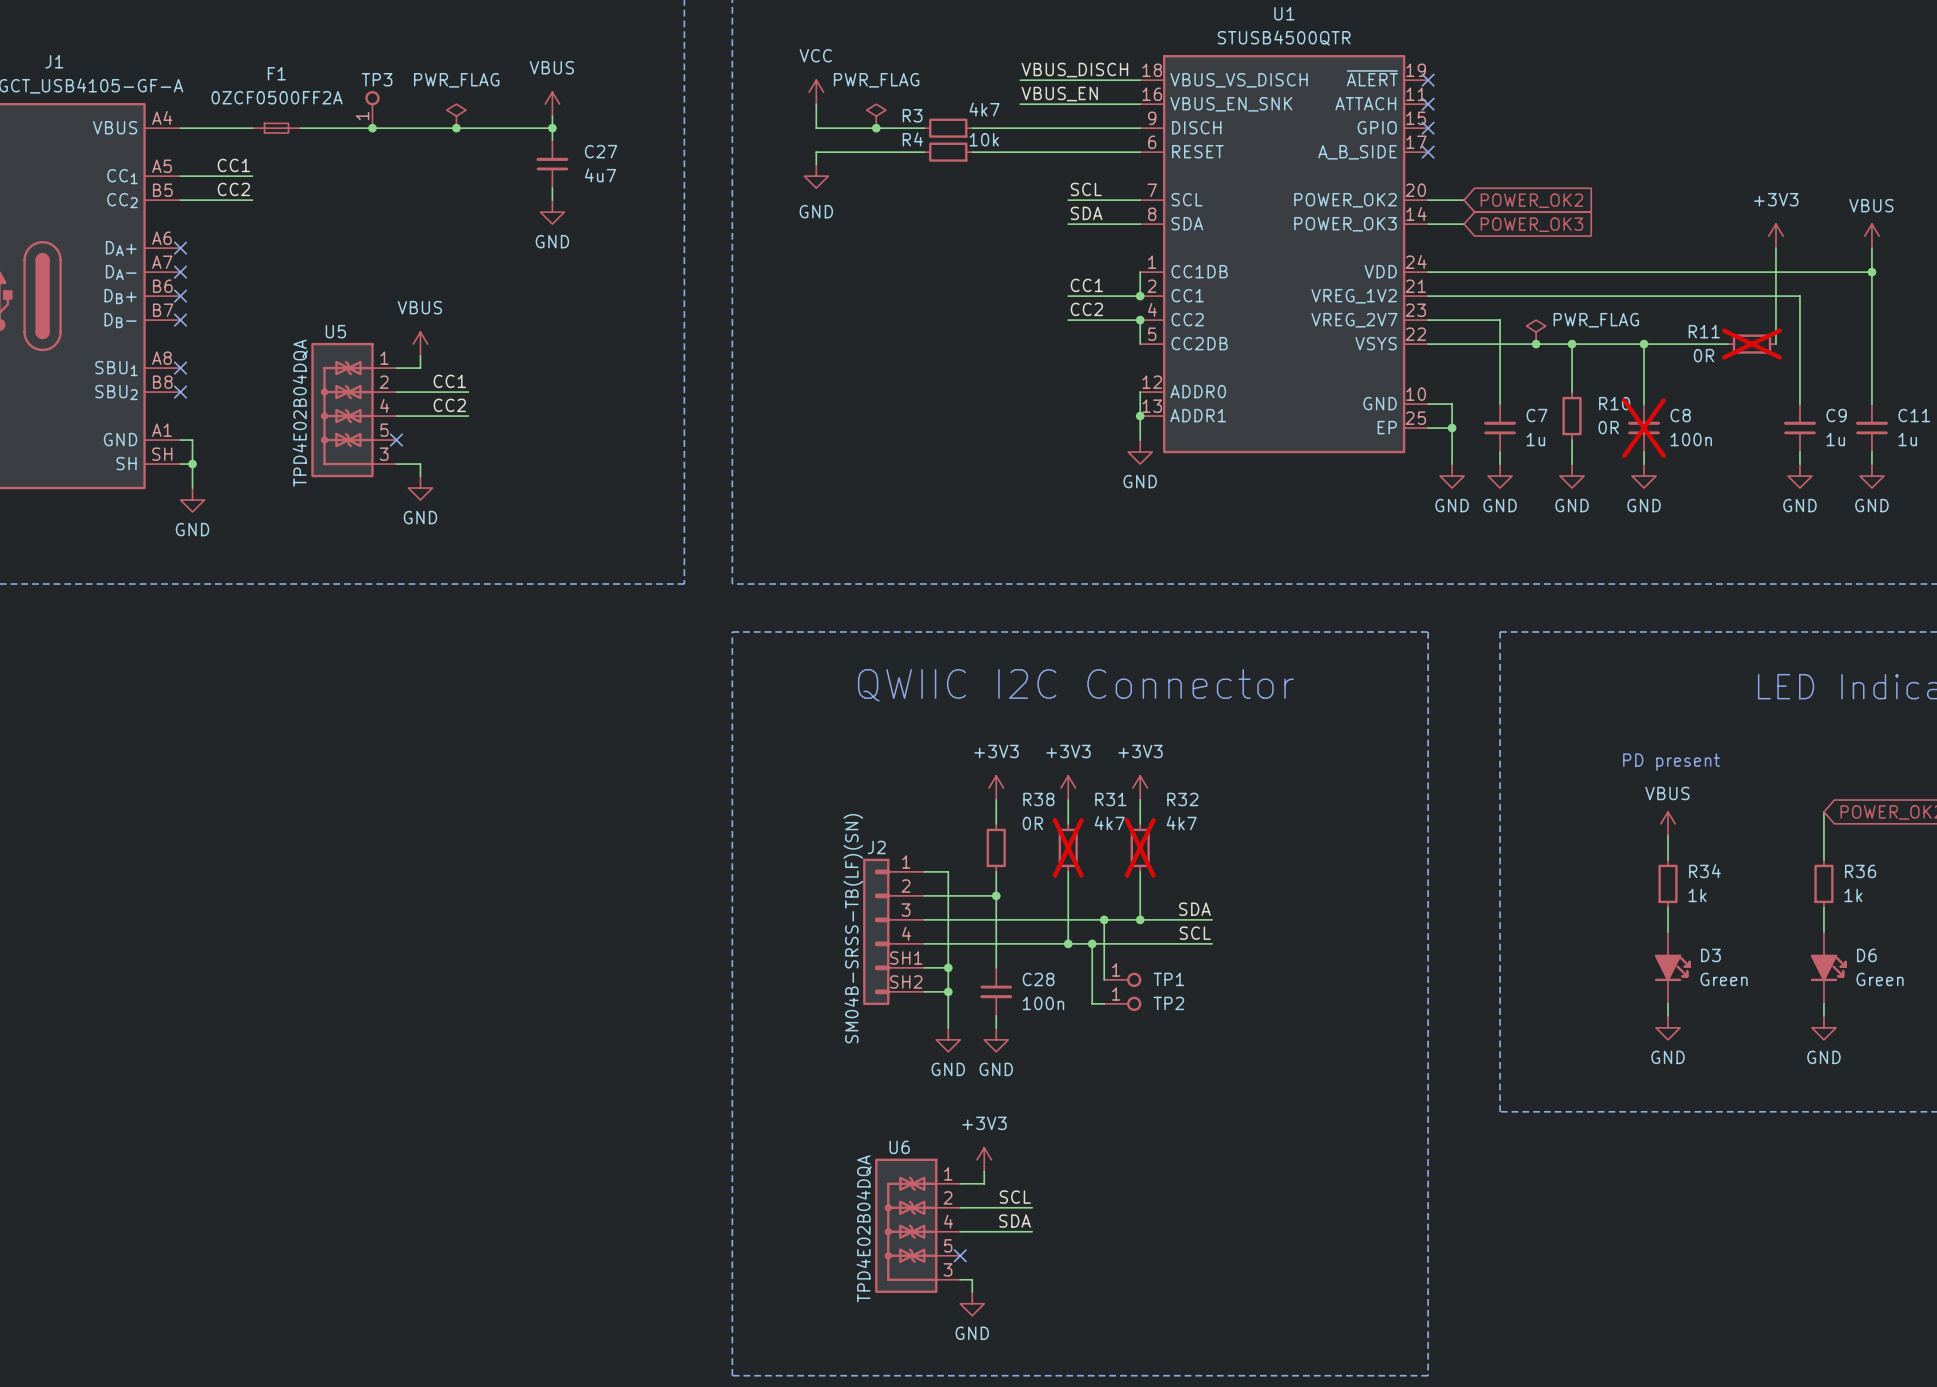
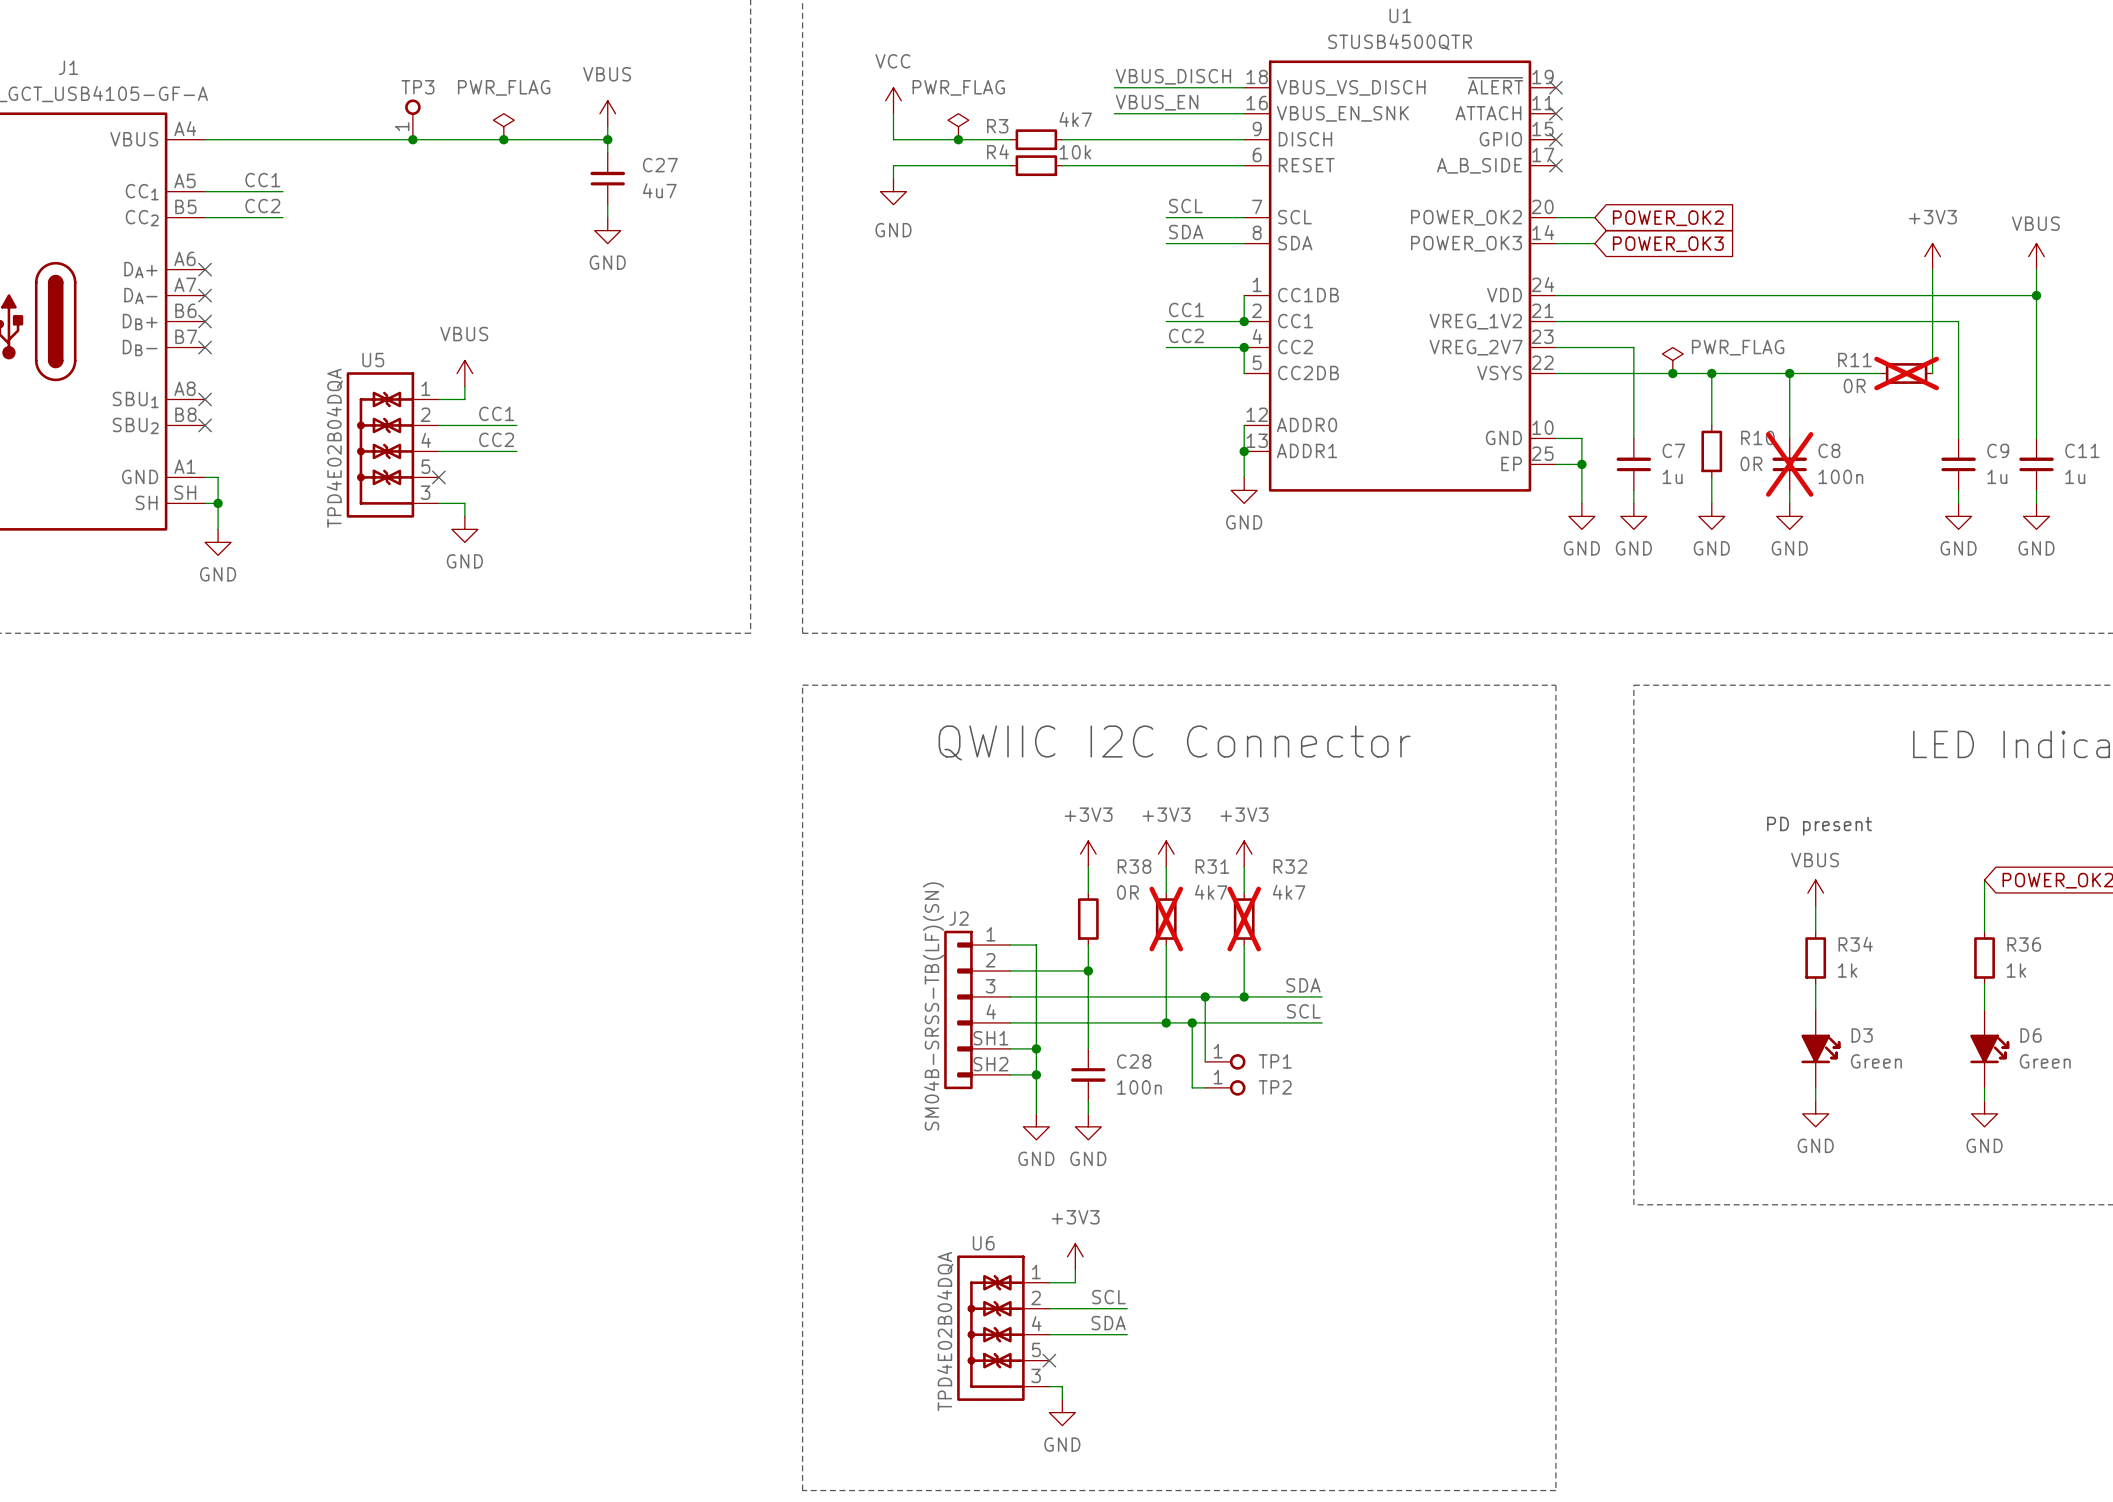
F1: (276, 128) -> none

